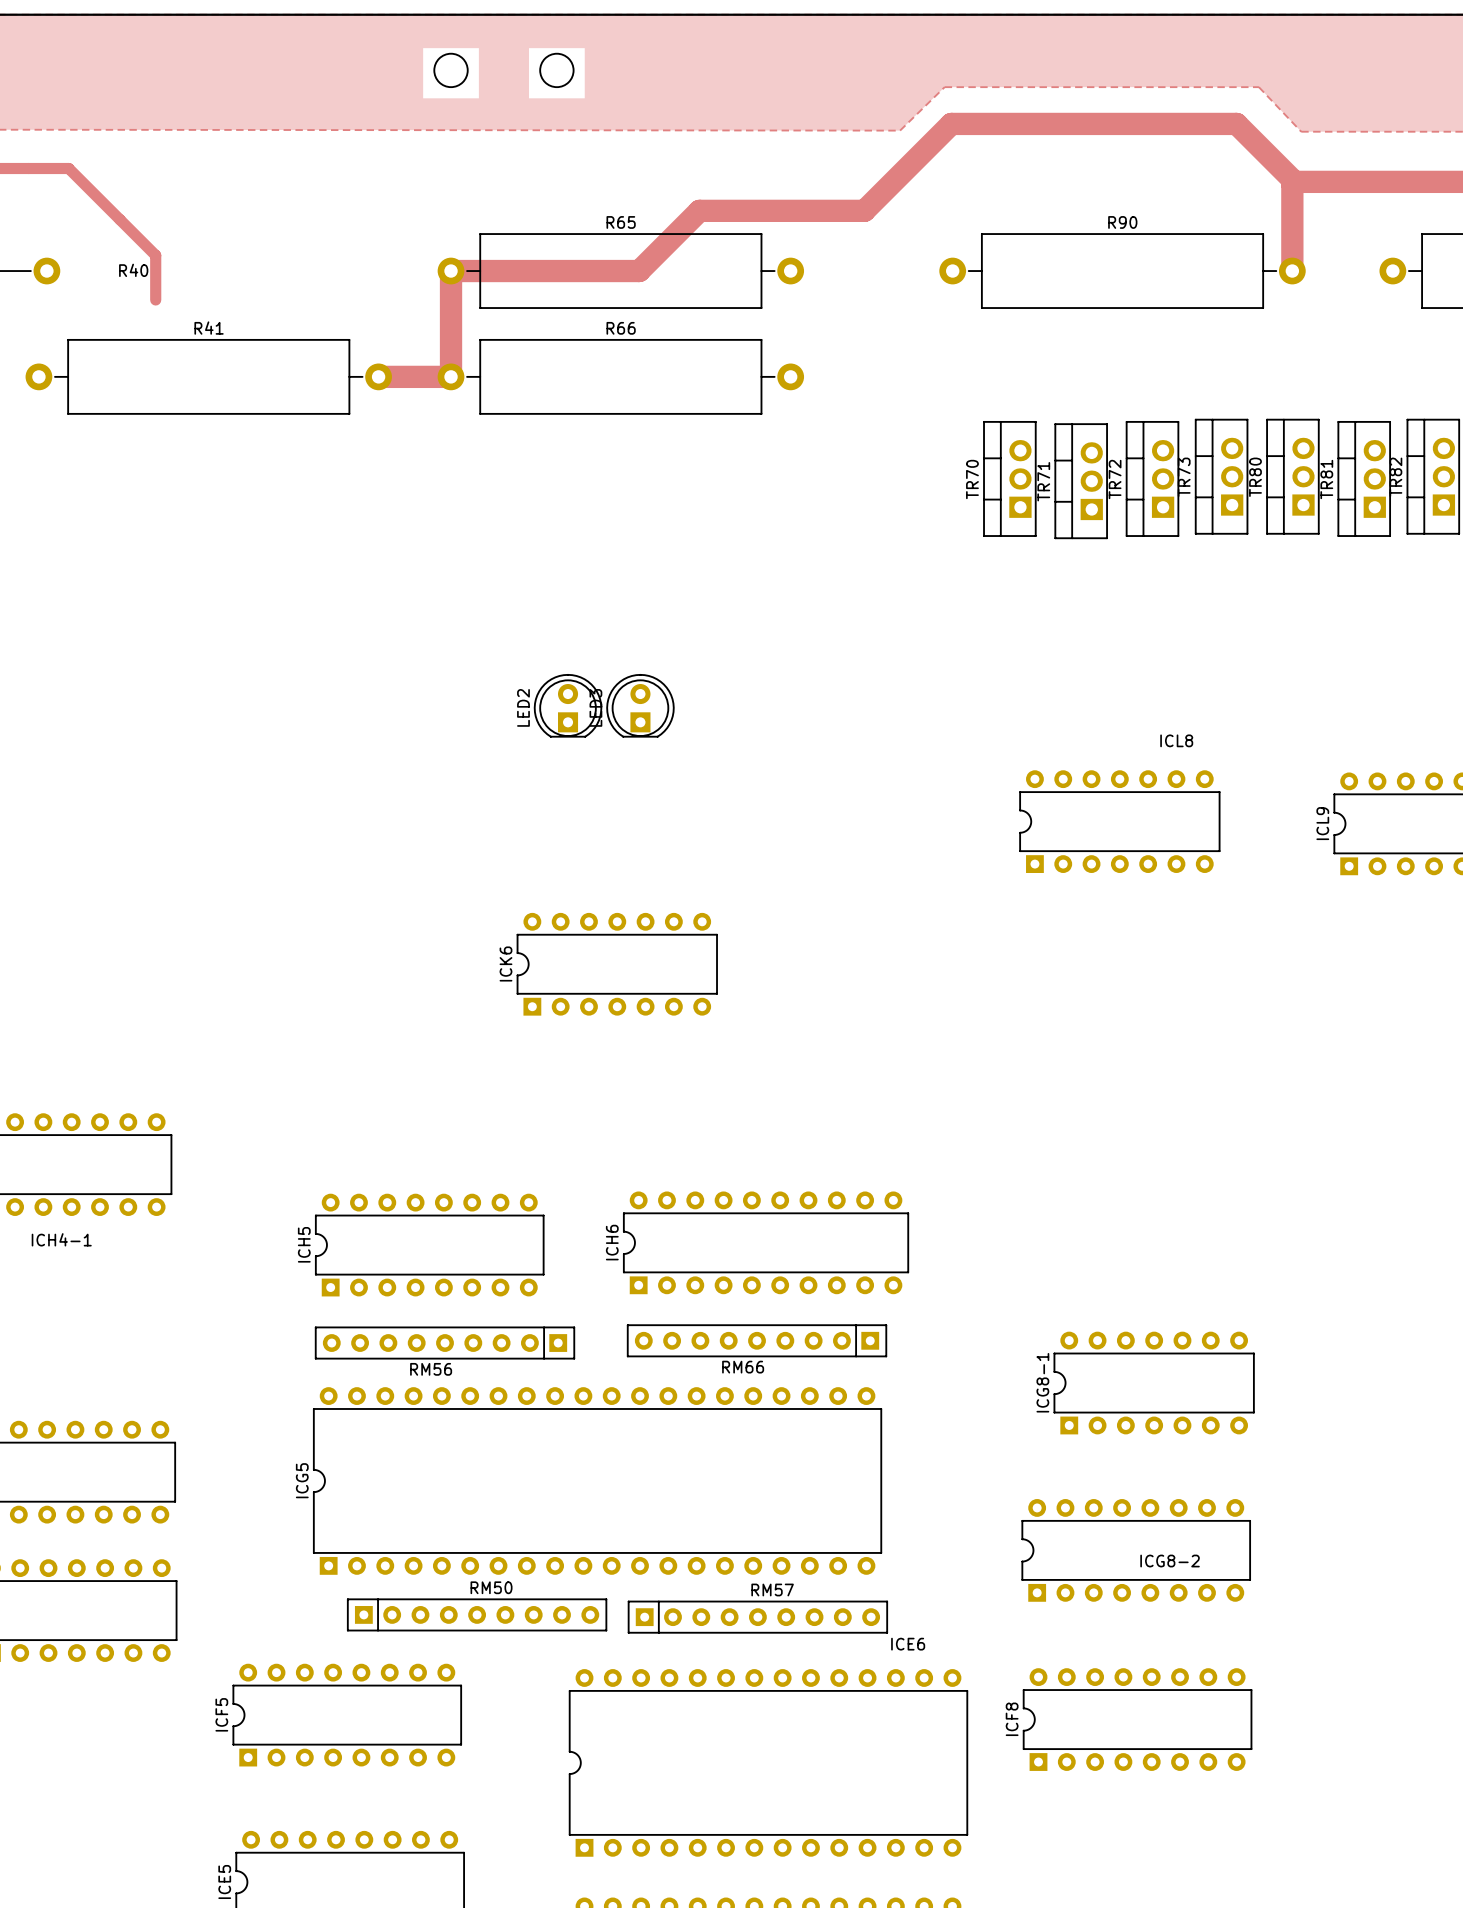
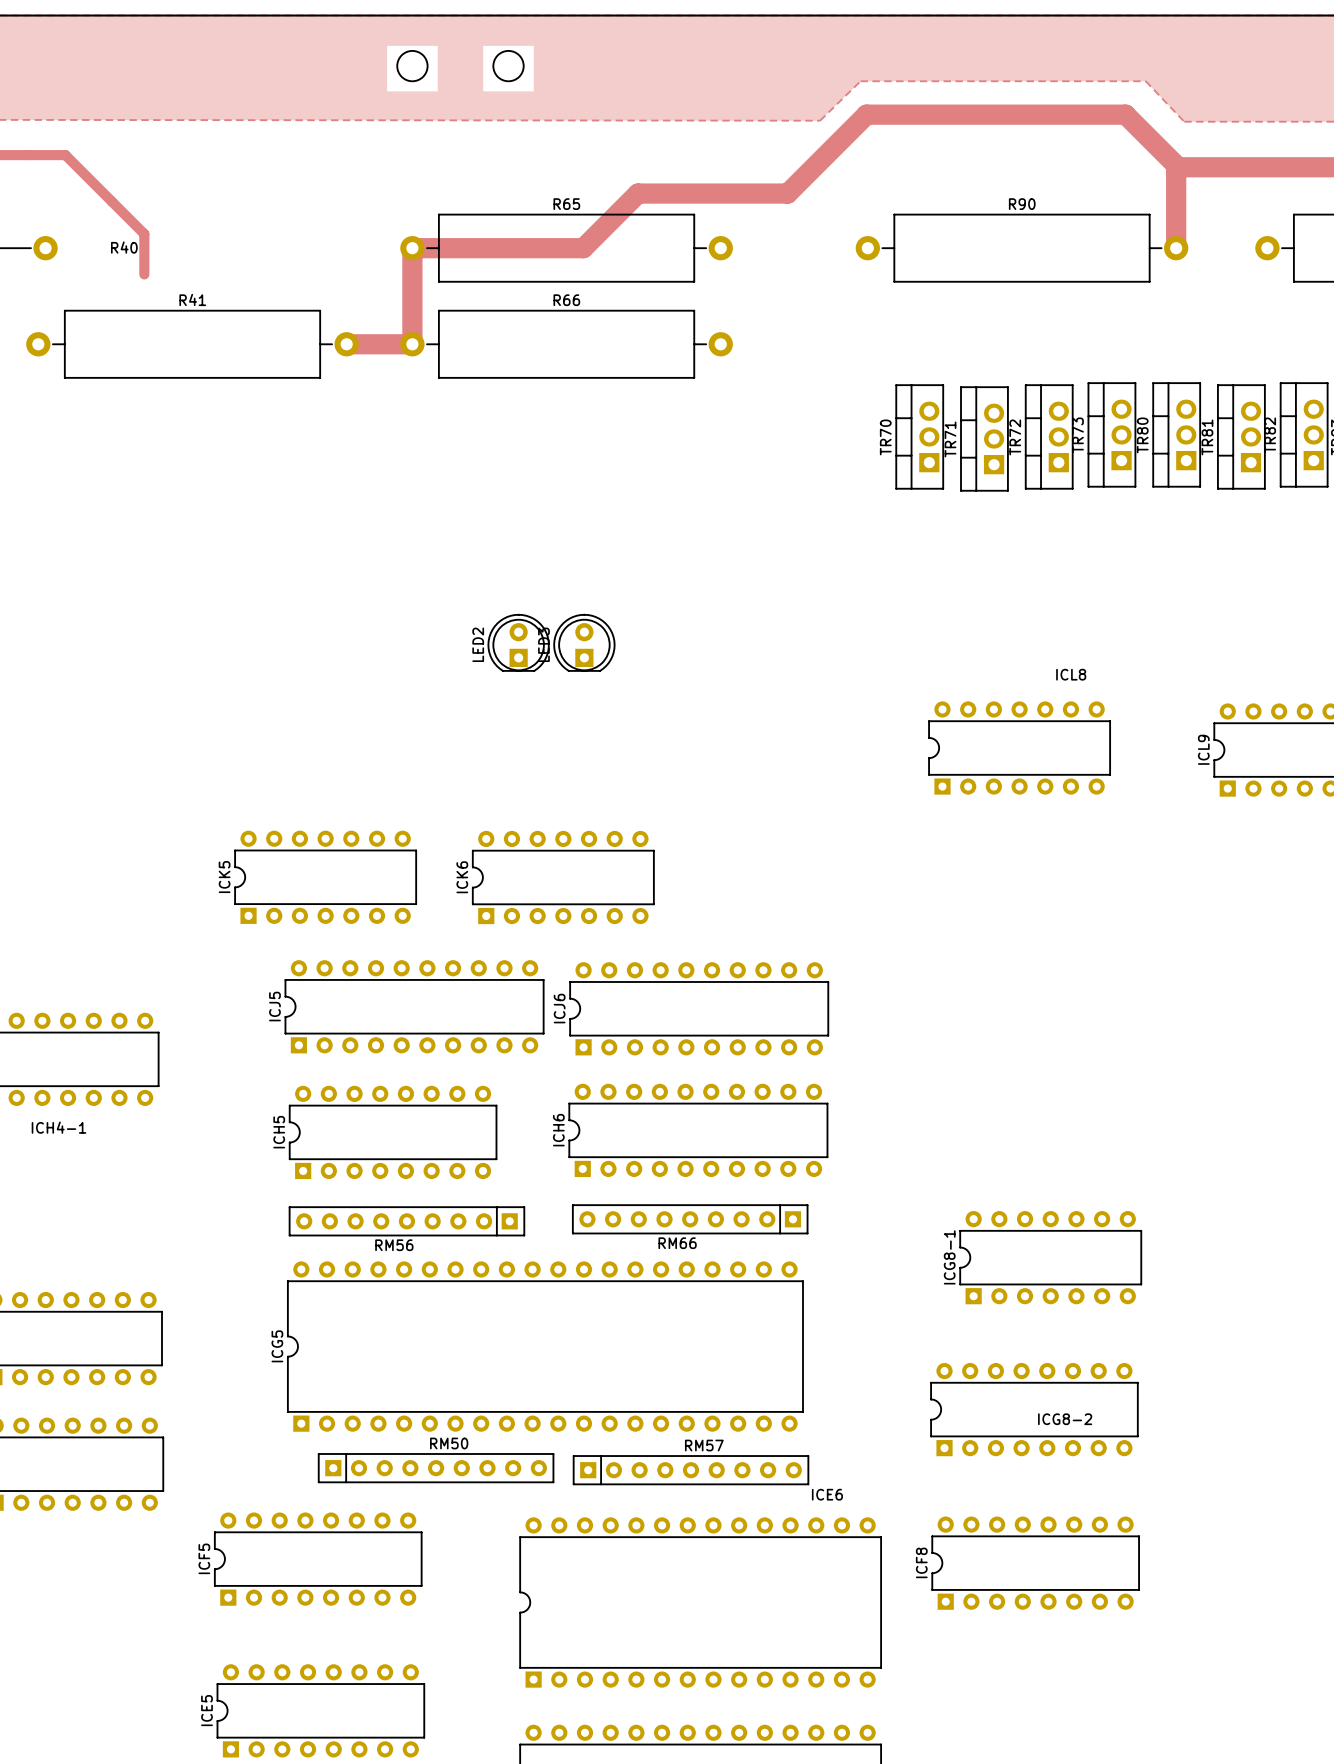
ICK5: none -> (325, 877)
ICJ5: none -> (414, 1006)
ICJ6: none -> (699, 1008)

